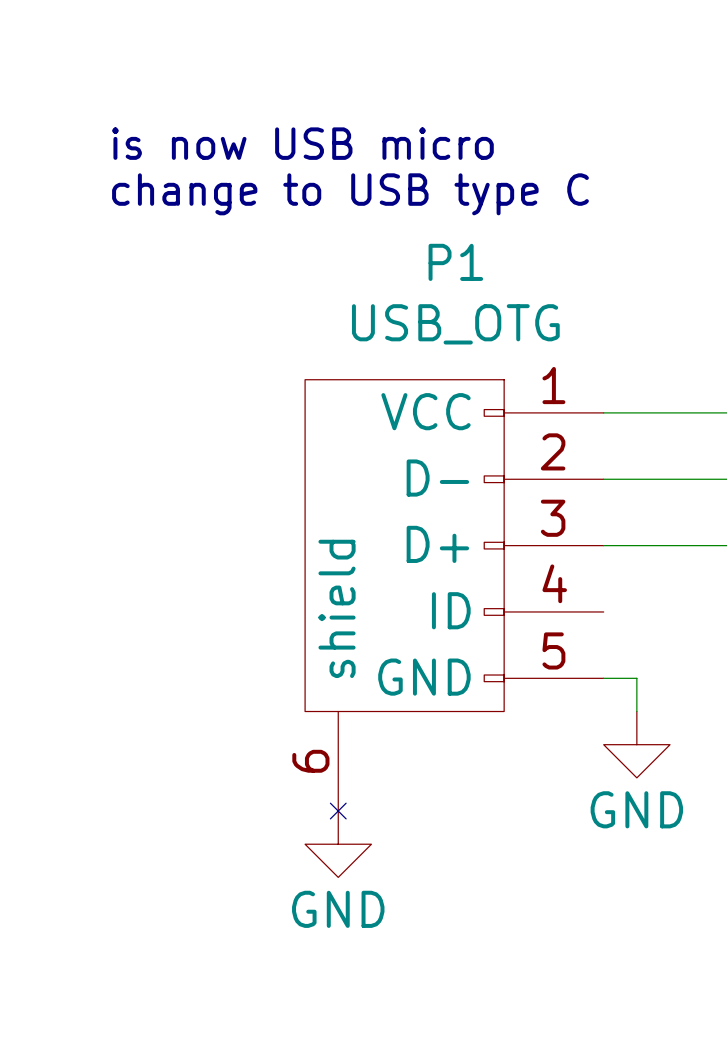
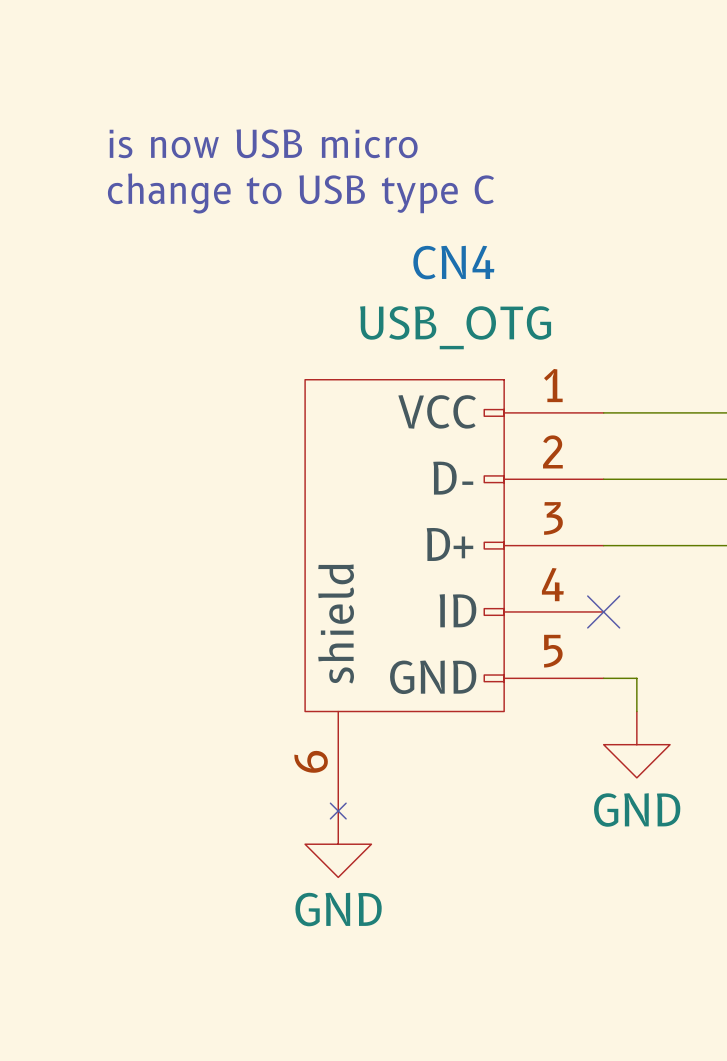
P1 name: P1 (455, 262) -> CN4 (453, 262)
no-connect mark: none -> (603, 611)

